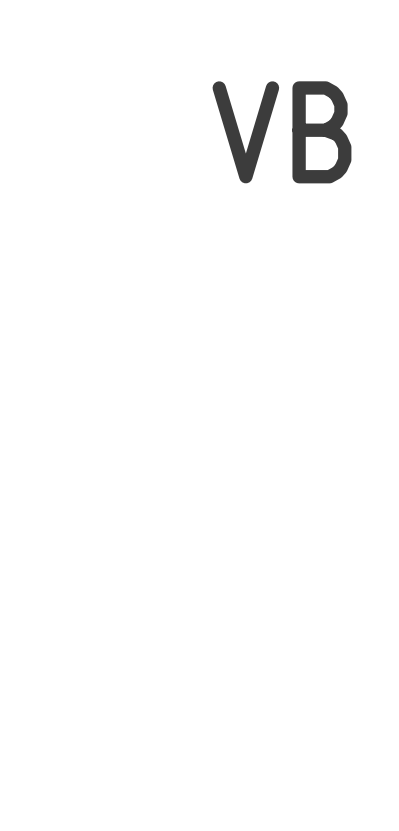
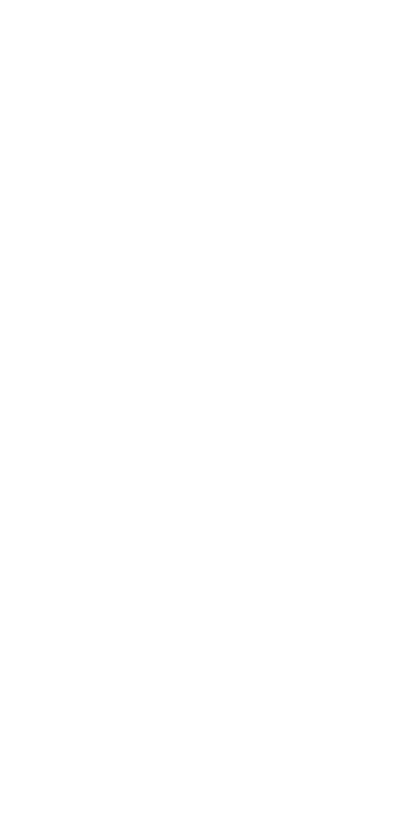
text: VB (282, 132) -> none

